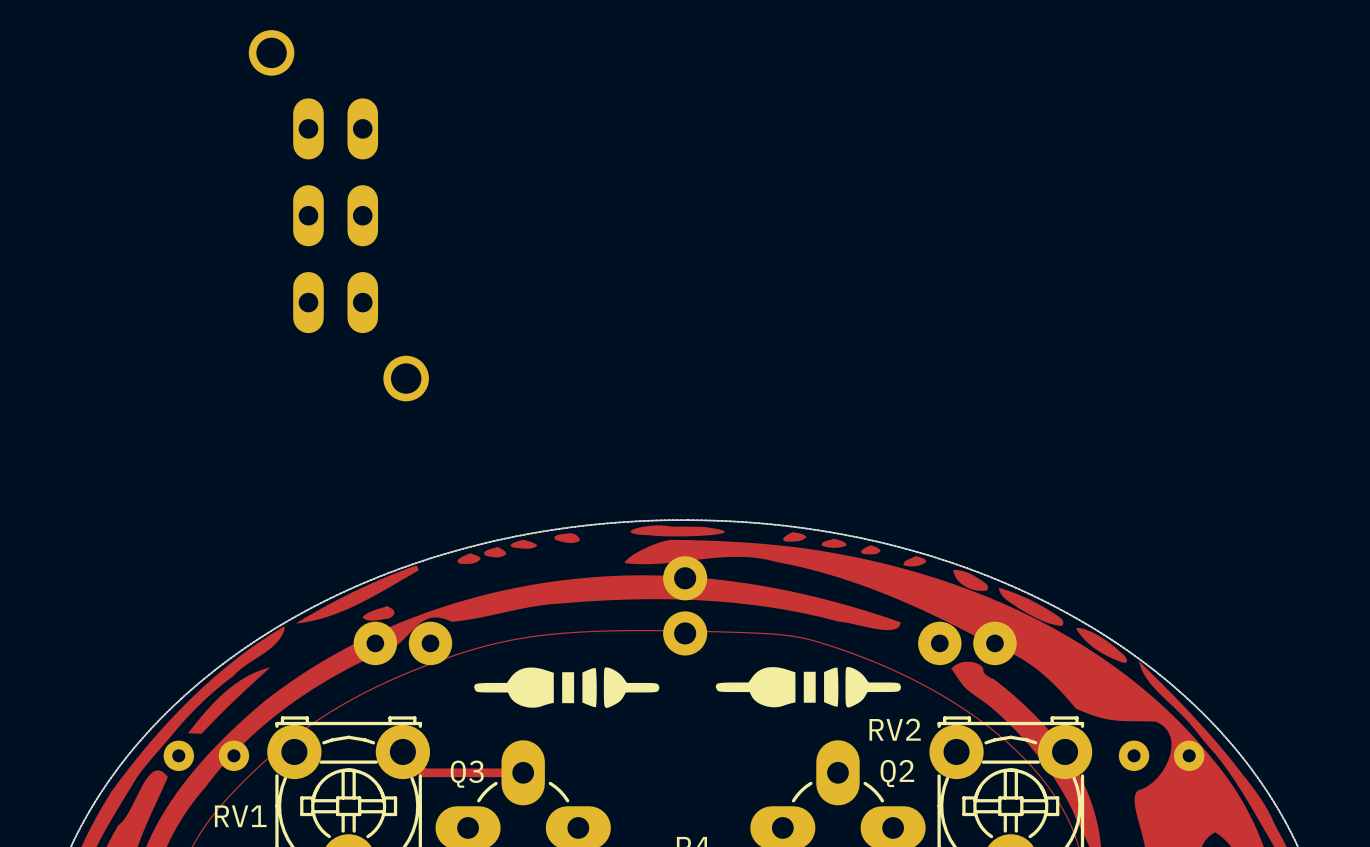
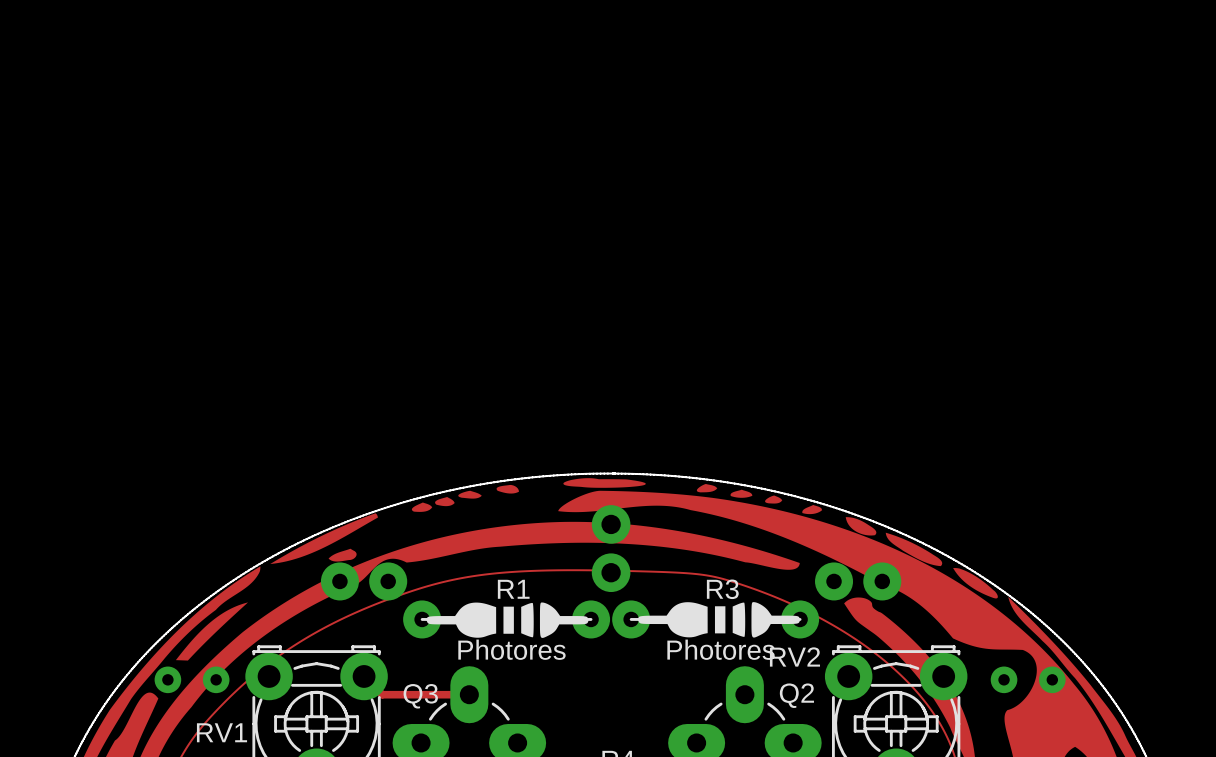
part: (338, 215) -> none
R1: none -> Photores (506, 619)
R3: none -> Photores (715, 619)

